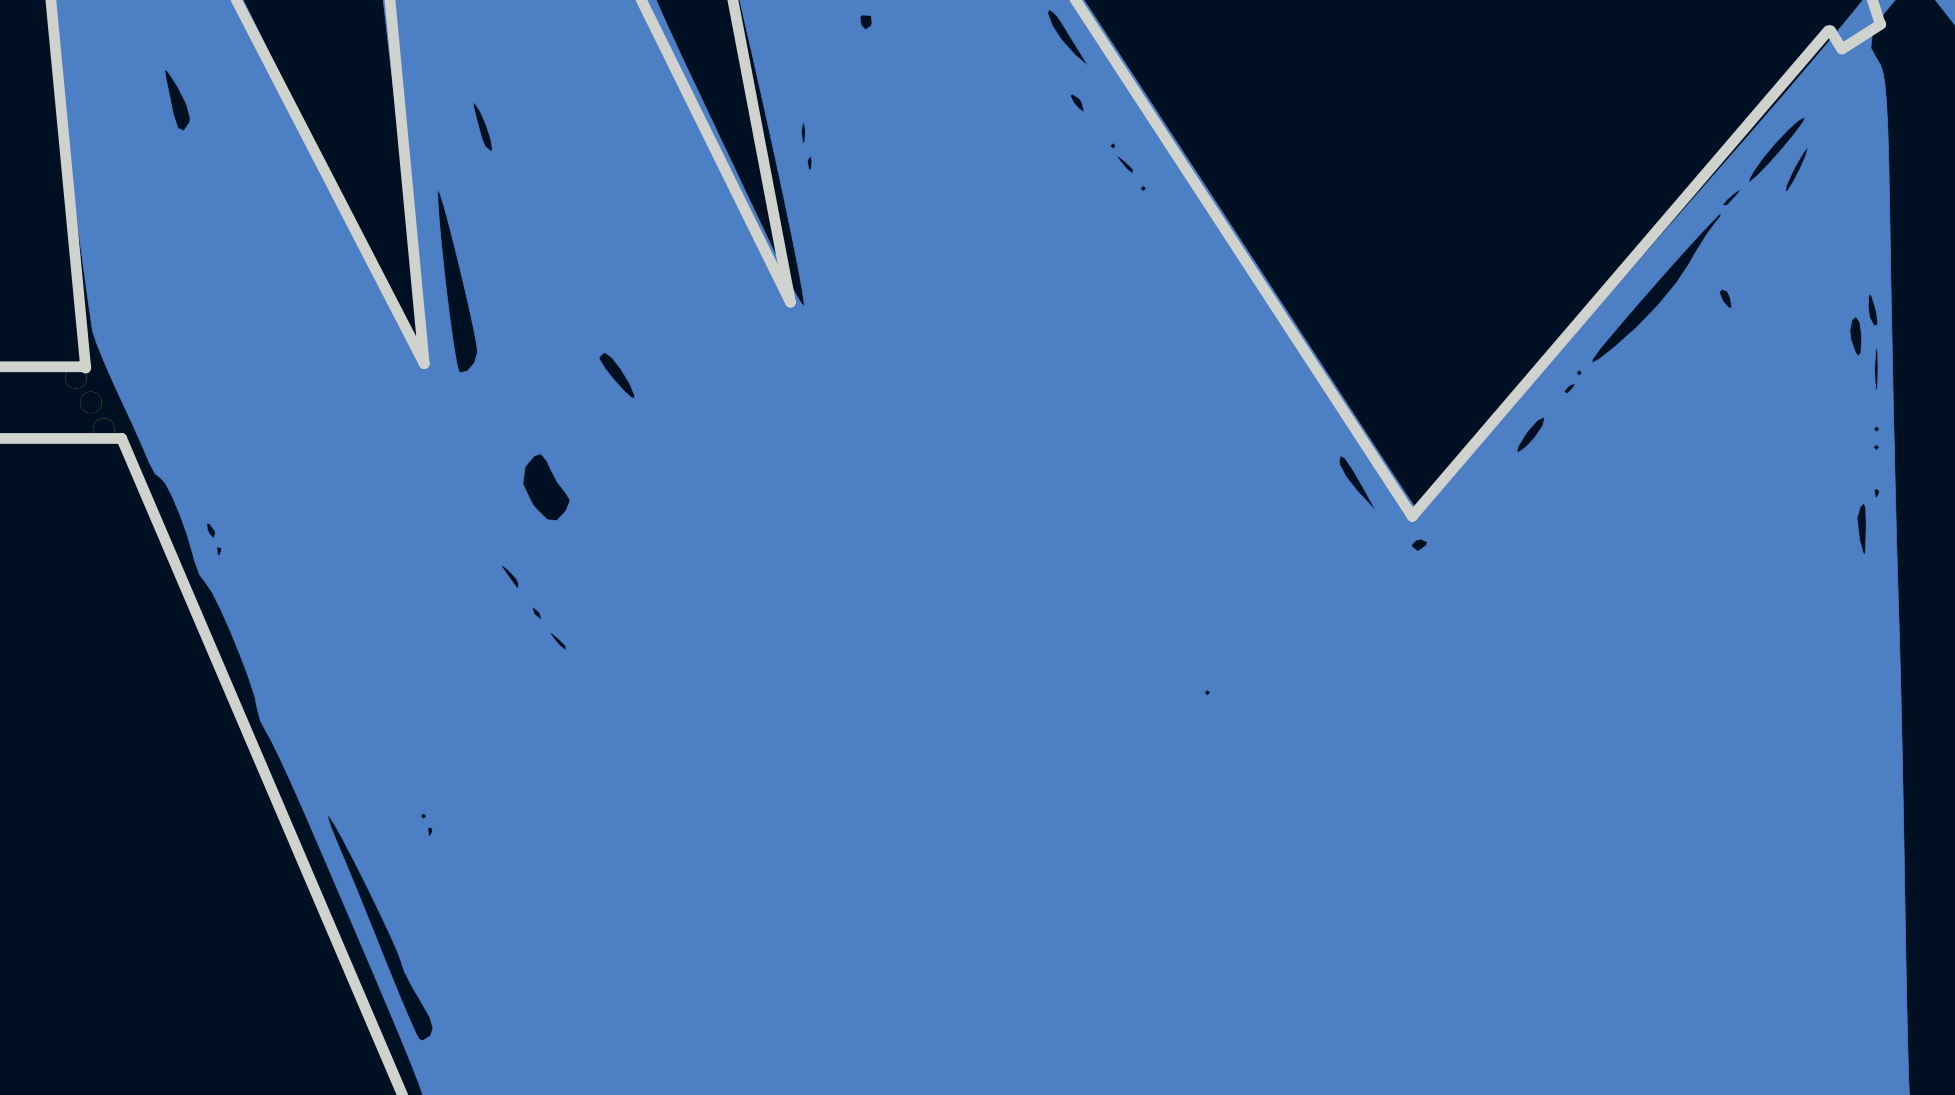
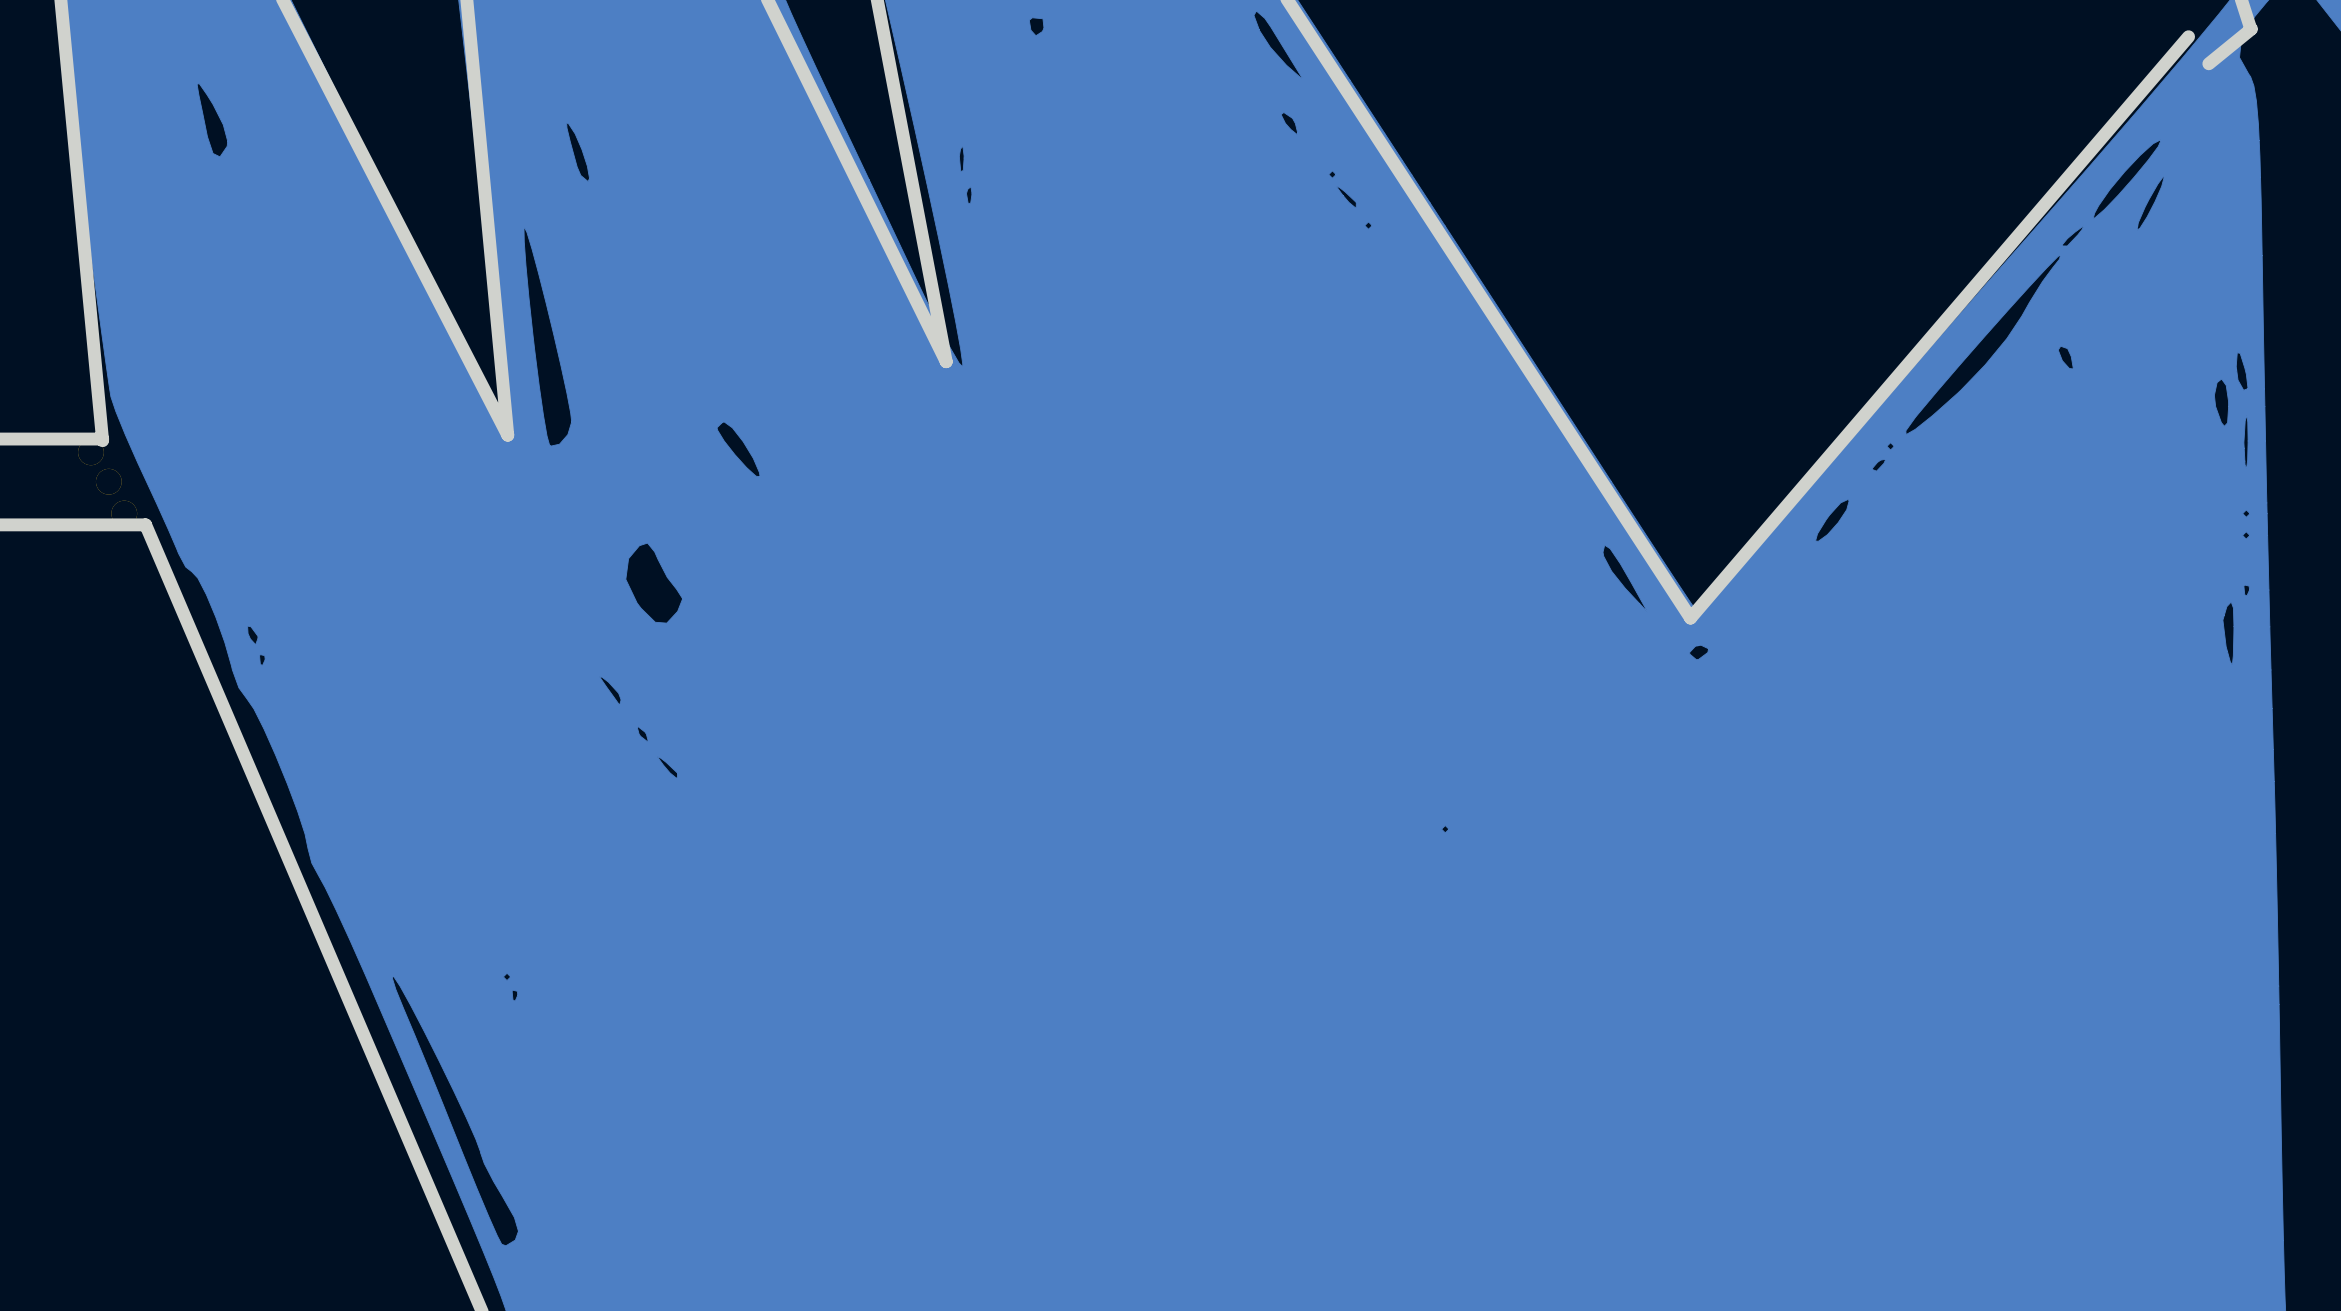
board edge: (1880, 24) (1842, 48) (1830, 30) -> (2251, 29) (2208, 63)

